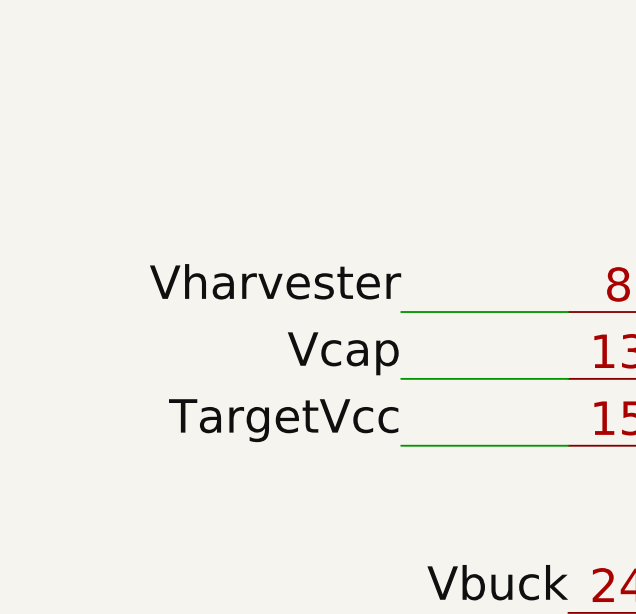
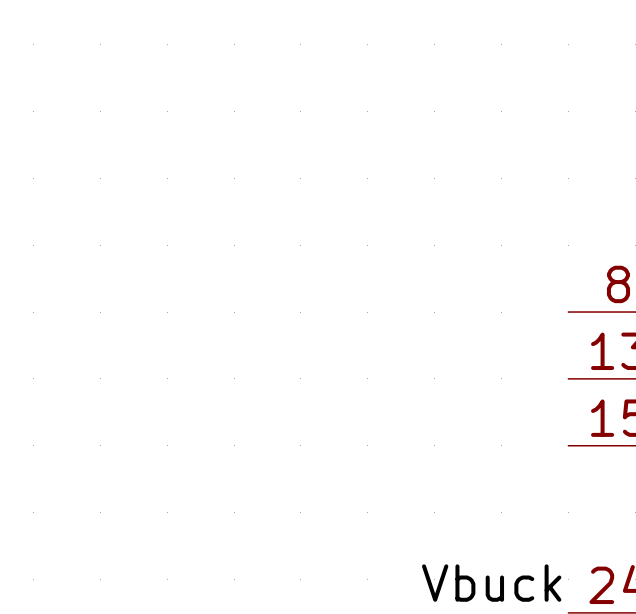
label: Vharvester (275, 281) -> none
wire: (401, 312) (568, 312) -> none
label: Vcap (343, 353) -> none
wire: (401, 378) (568, 378) -> none
label: TargetVcc (283, 420) -> none
wire: (401, 445) (568, 445) -> none

